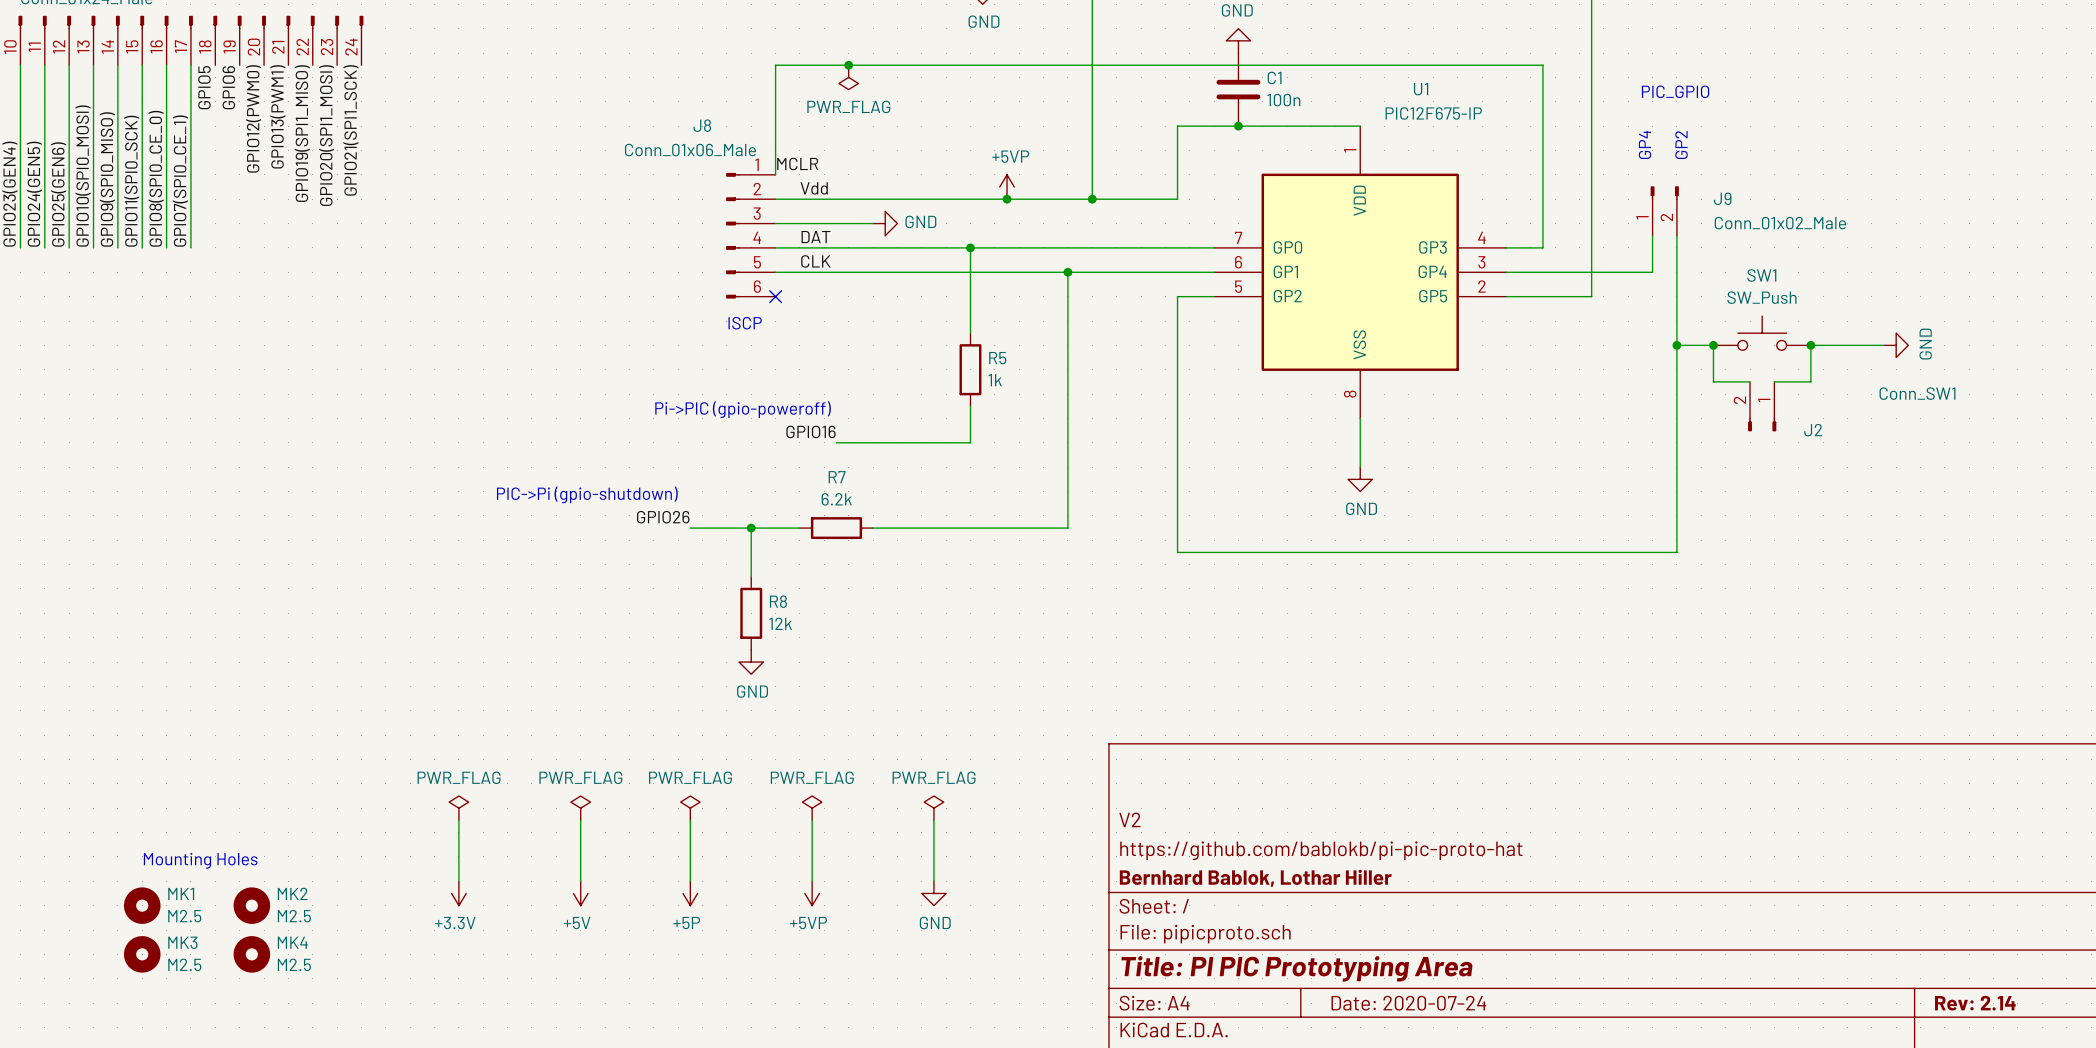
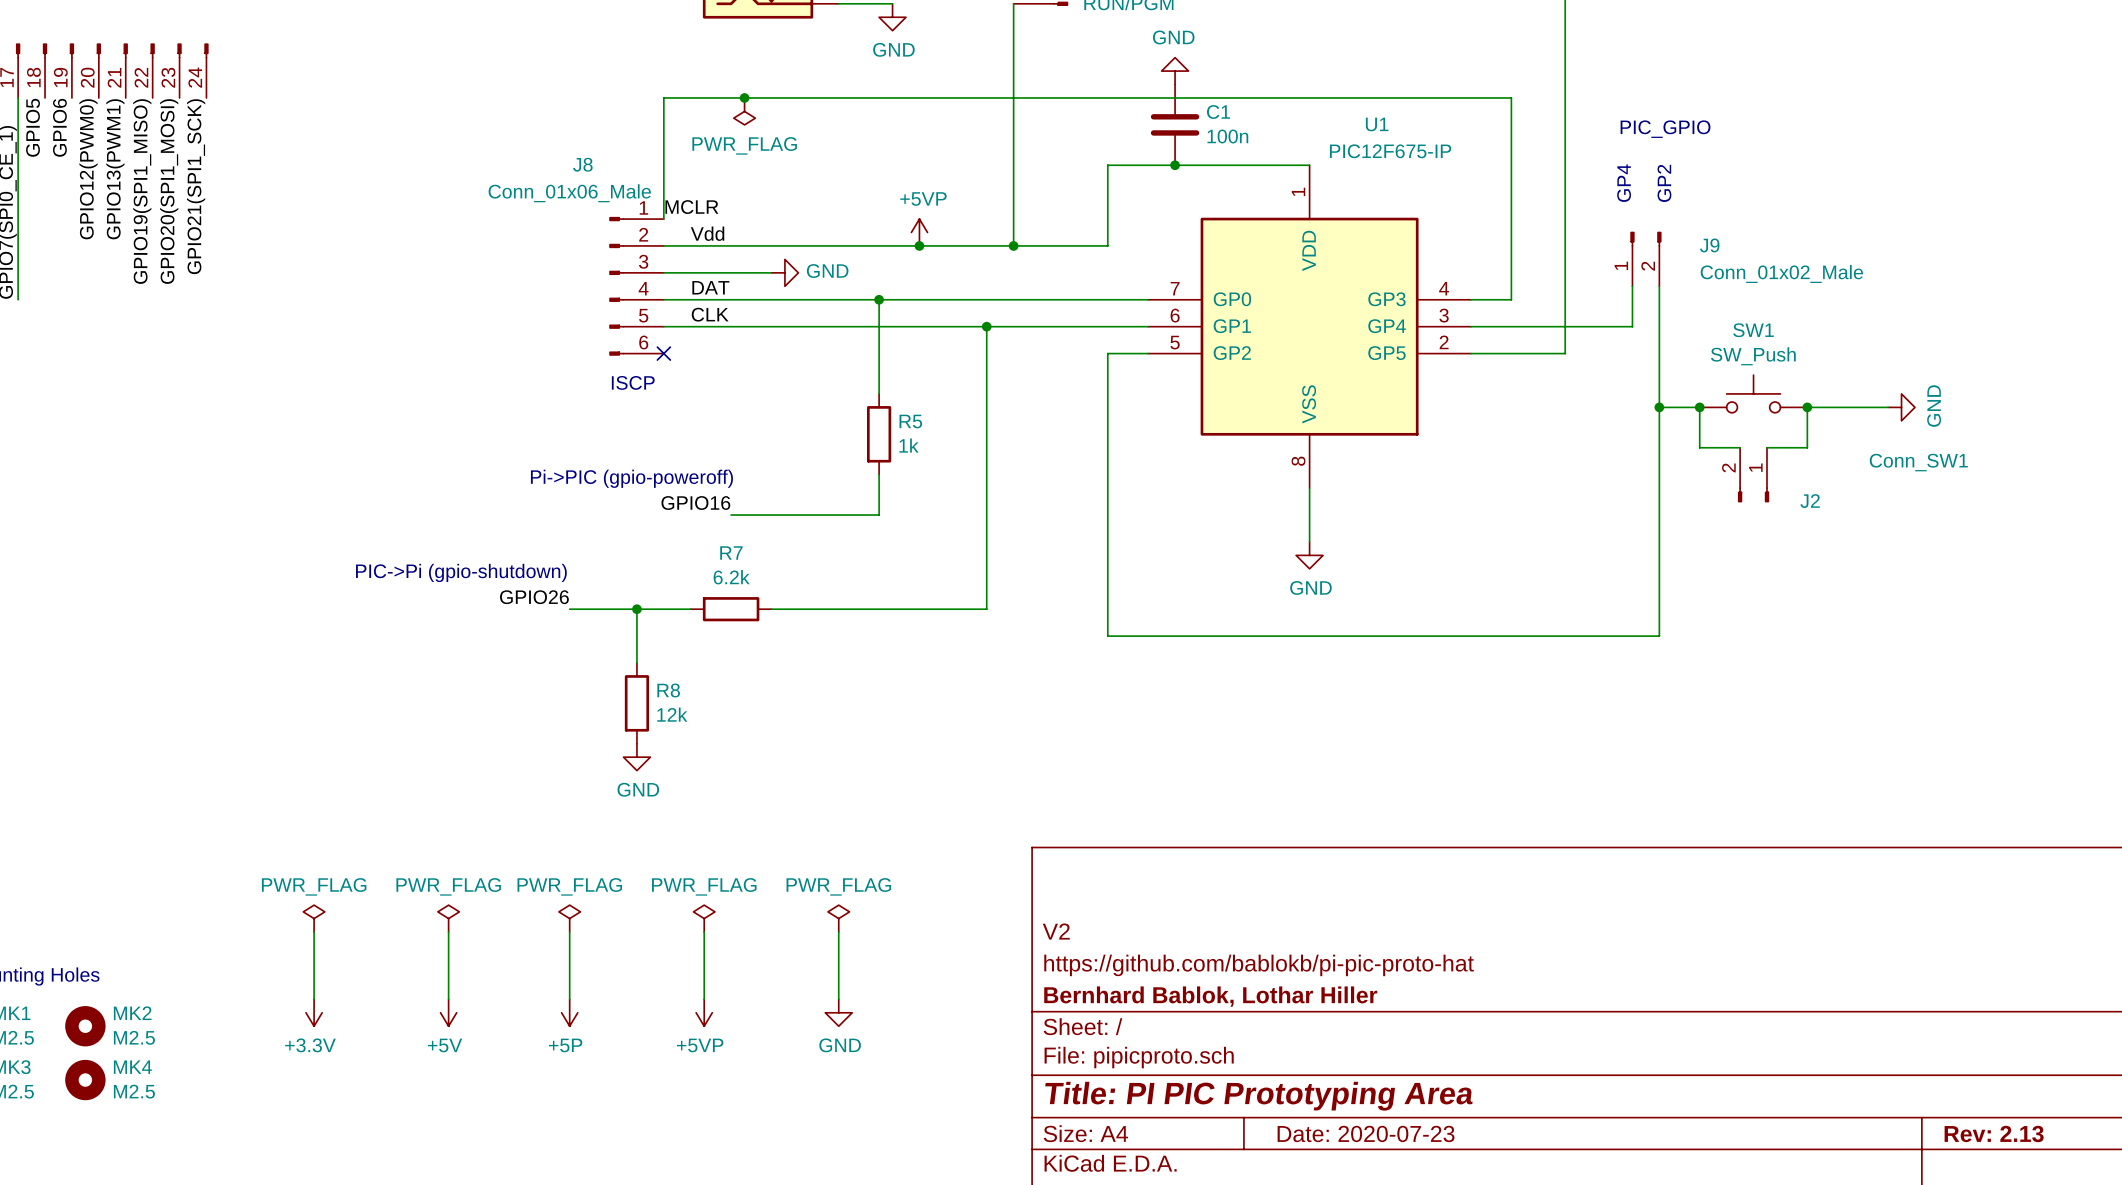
title block: Date: 2020-07-24 (1408, 1003) -> Date: 2020-07-23 (1366, 1133)
title block: Rev: 2.14 (1975, 1003) -> Rev: 2.13 (1994, 1133)

